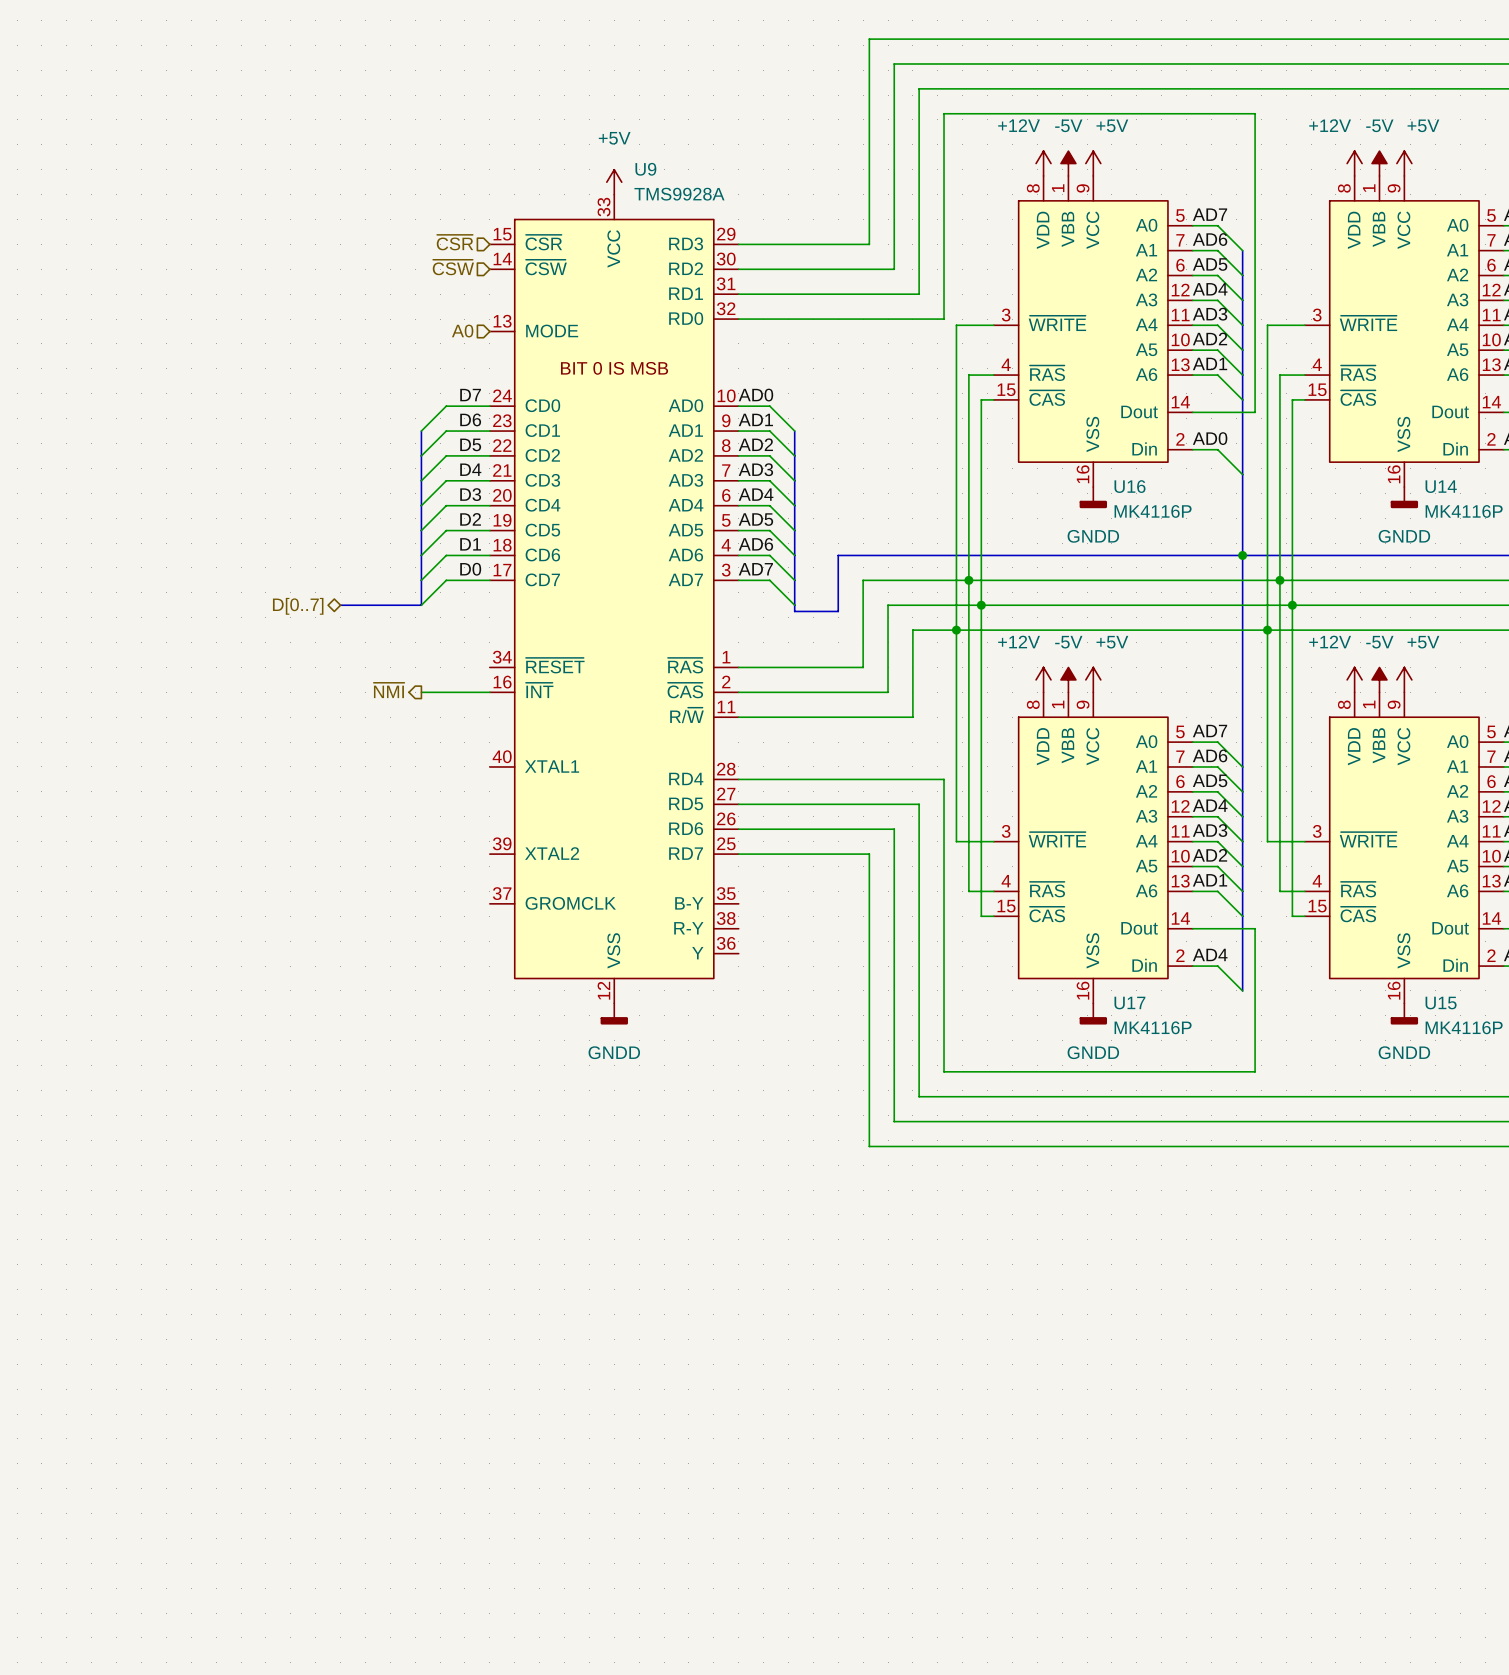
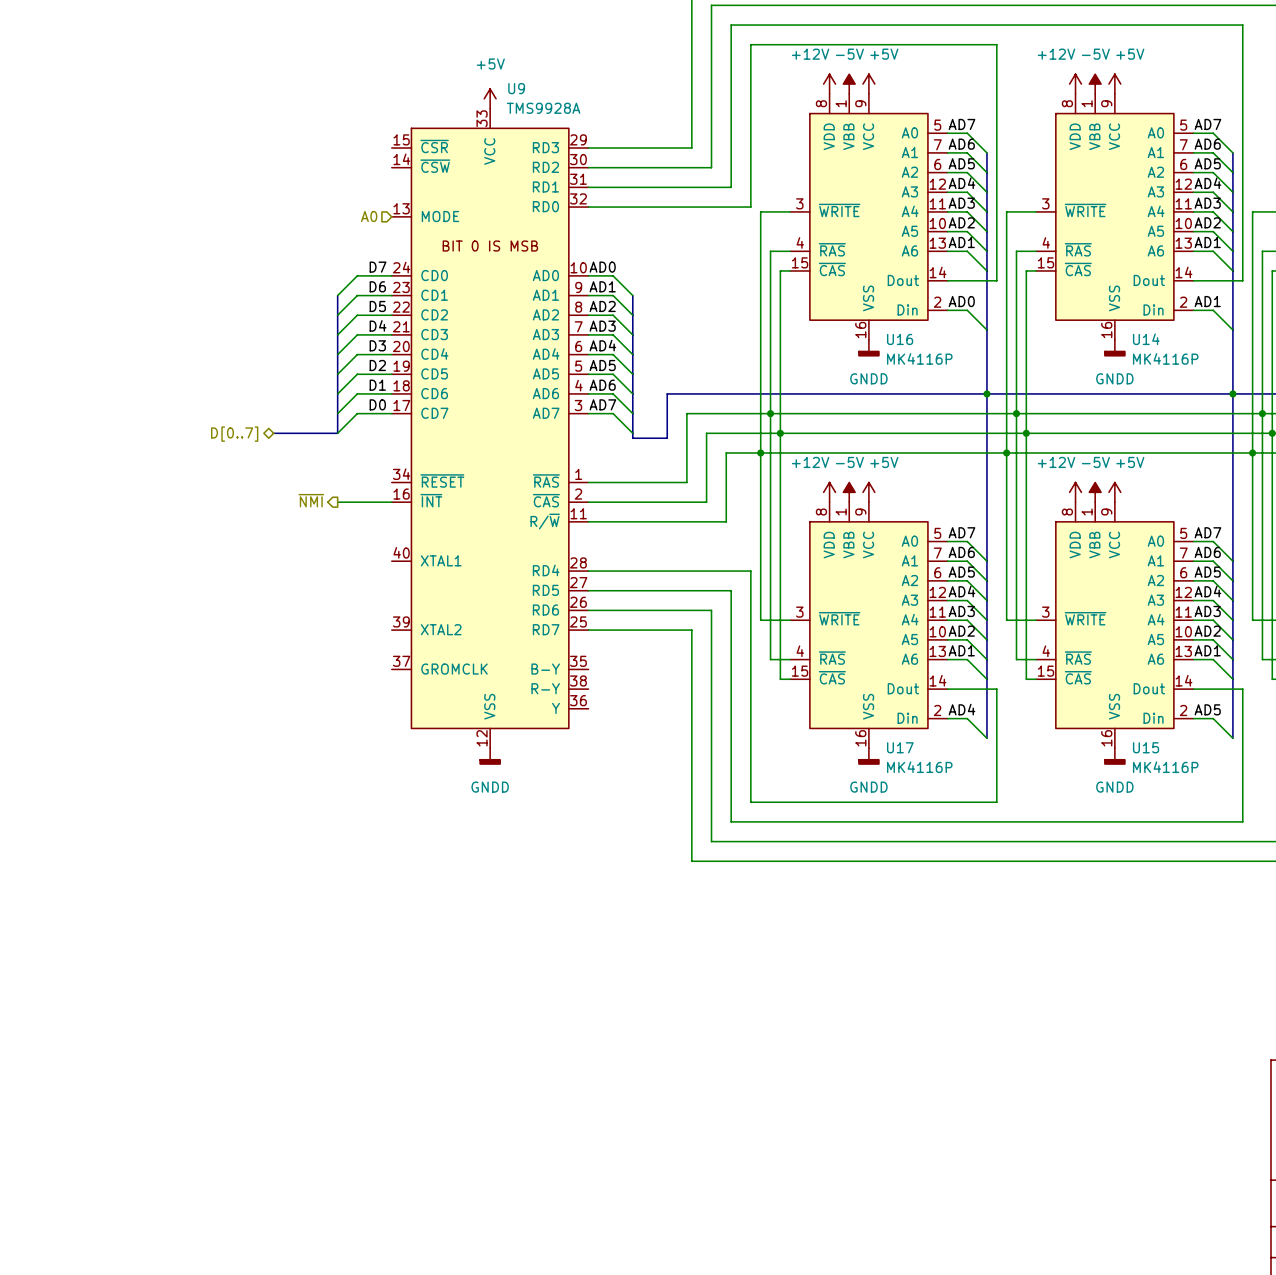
hierarchical label: ~{CSR} (455, 242) -> none
hierarchical label: ~{CSW} (453, 267) -> none

